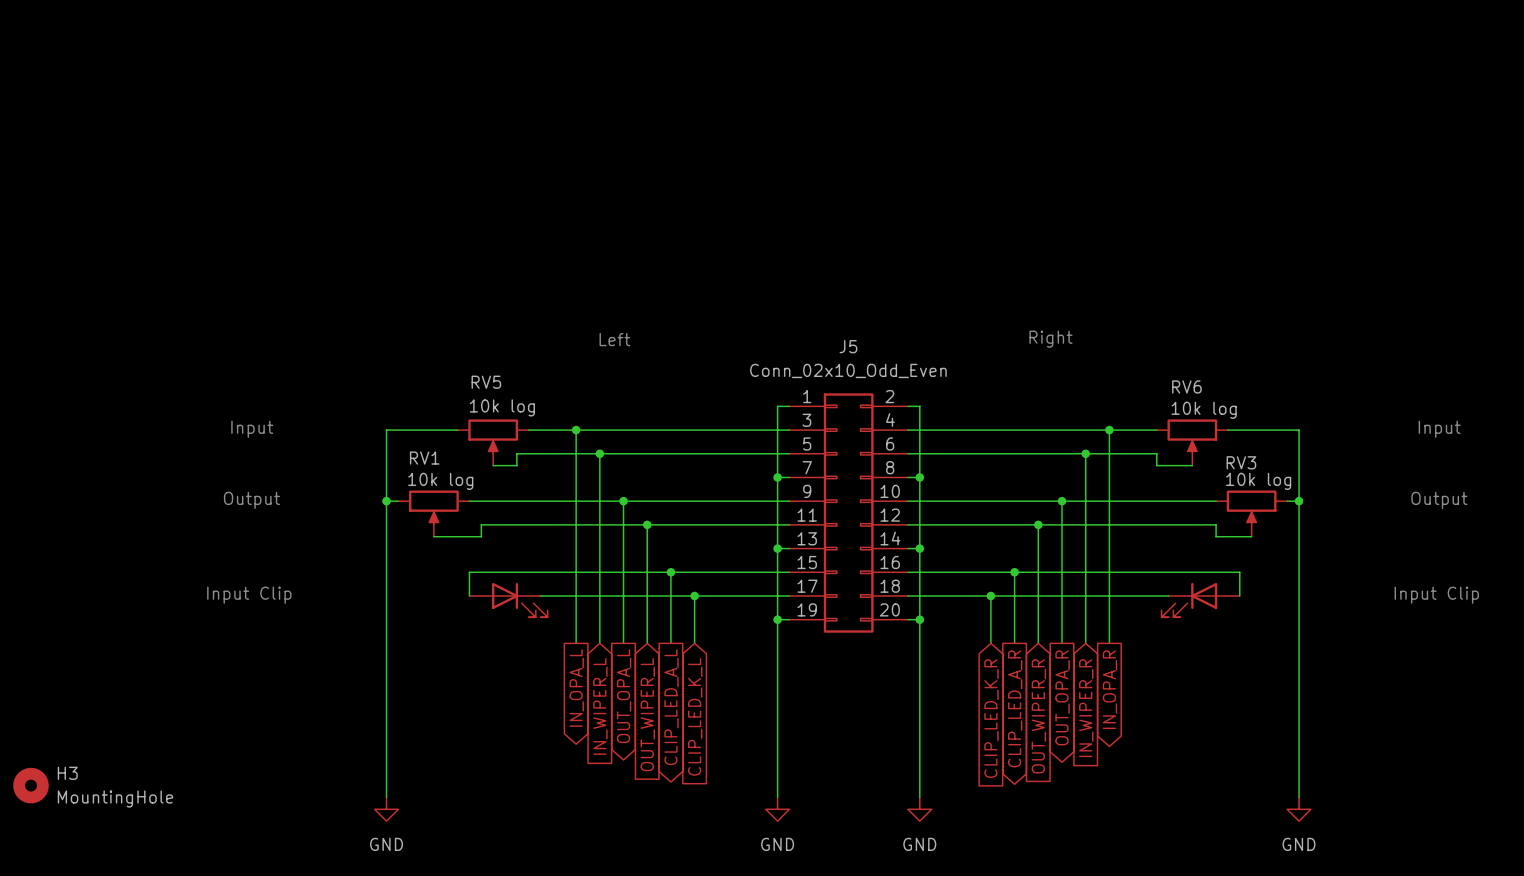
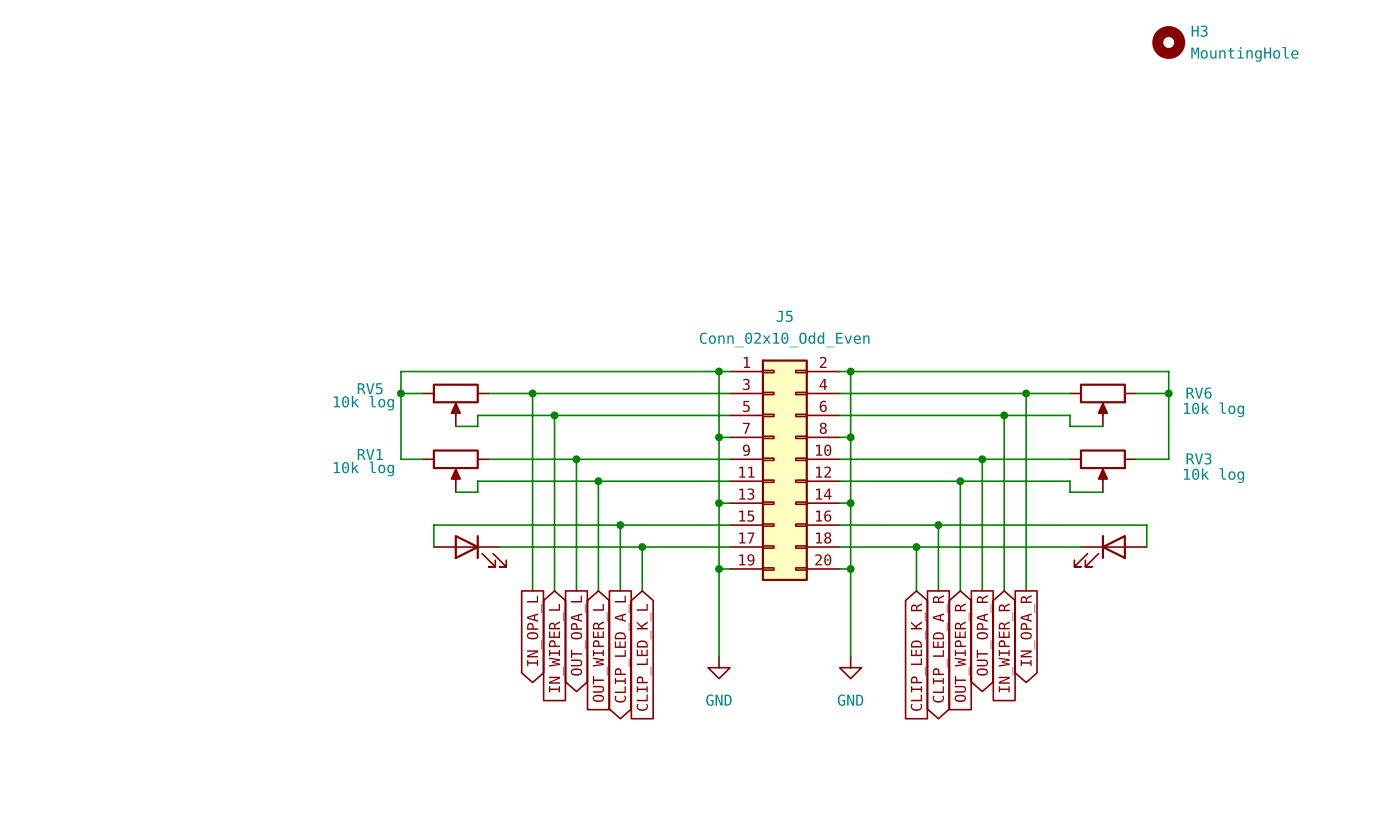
text: Left (614, 339) -> none
text: Right (1051, 339) -> none
RV5 name position: RV5 (486, 382) -> RV5 (370, 388)
RV6 name position: RV6 (1186, 386) -> RV6 (1199, 393)
wire: none -> (719, 371) (400, 371) (400, 459) (422, 459)
junction: none -> (719, 371)
wire: none -> (850, 371) (1168, 371) (1168, 459) (1135, 459)
junction: none -> (850, 371)
RV5 value position: 10k log (502, 407) -> 10k log (363, 403)
RV6 value position: 10k log (1204, 410) -> 10k log (1214, 409)
text: Input (252, 429) -> none
text: Input (1439, 429) -> none
wire: (433, 430) (386, 430) (386, 797) -> none
junction: none -> (400, 393)
wire: (1263, 430) (1299, 430) (1299, 797) -> none
junction: none -> (1168, 393)
RV1 name position: RV1 (424, 458) -> RV1 (370, 454)
RV3 name position: RV3 (1241, 462) -> RV3 (1198, 458)
RV1 value position: 10k log (440, 481) -> 10k log (363, 469)
RV3 value position: 10k log (1258, 481) -> 10k log (1214, 475)
text: Output (251, 500) -> none
text: Output (1439, 500) -> none
wire: (386, 501) (398, 501) -> none
junction: (386, 501) -> none
wire: (469, 501) (528, 501) -> none
wire: (1156, 501) (1216, 501) -> none
wire: (1287, 501) (1299, 501) -> none
junction: (1299, 501) -> none
RV1 position: (433, 513) -> (455, 470)
RV3 position: (1251, 513) -> (1102, 470)
wire: (516, 524) (481, 524) (481, 536) (433, 536) -> (477, 481) (477, 492) (455, 492)
wire: (1156, 524) (1216, 524) (1216, 536) (1251, 536) -> (1070, 481) (1070, 492) (1102, 492)
text: Input Clip (249, 595) -> none
text: Input Clip (1436, 595) -> none
wire: (777, 714) (777, 797) -> none
wire: (919, 714) (919, 797) -> none
power symbol: none -> GND (719, 667)
power symbol: none -> GND (850, 667)
H3 position: (31, 785) -> (1168, 42)
power symbol: GND (386, 809) -> none
power symbol: GND (777, 809) -> none
power symbol: GND (919, 809) -> none
power symbol: GND (1299, 809) -> none

